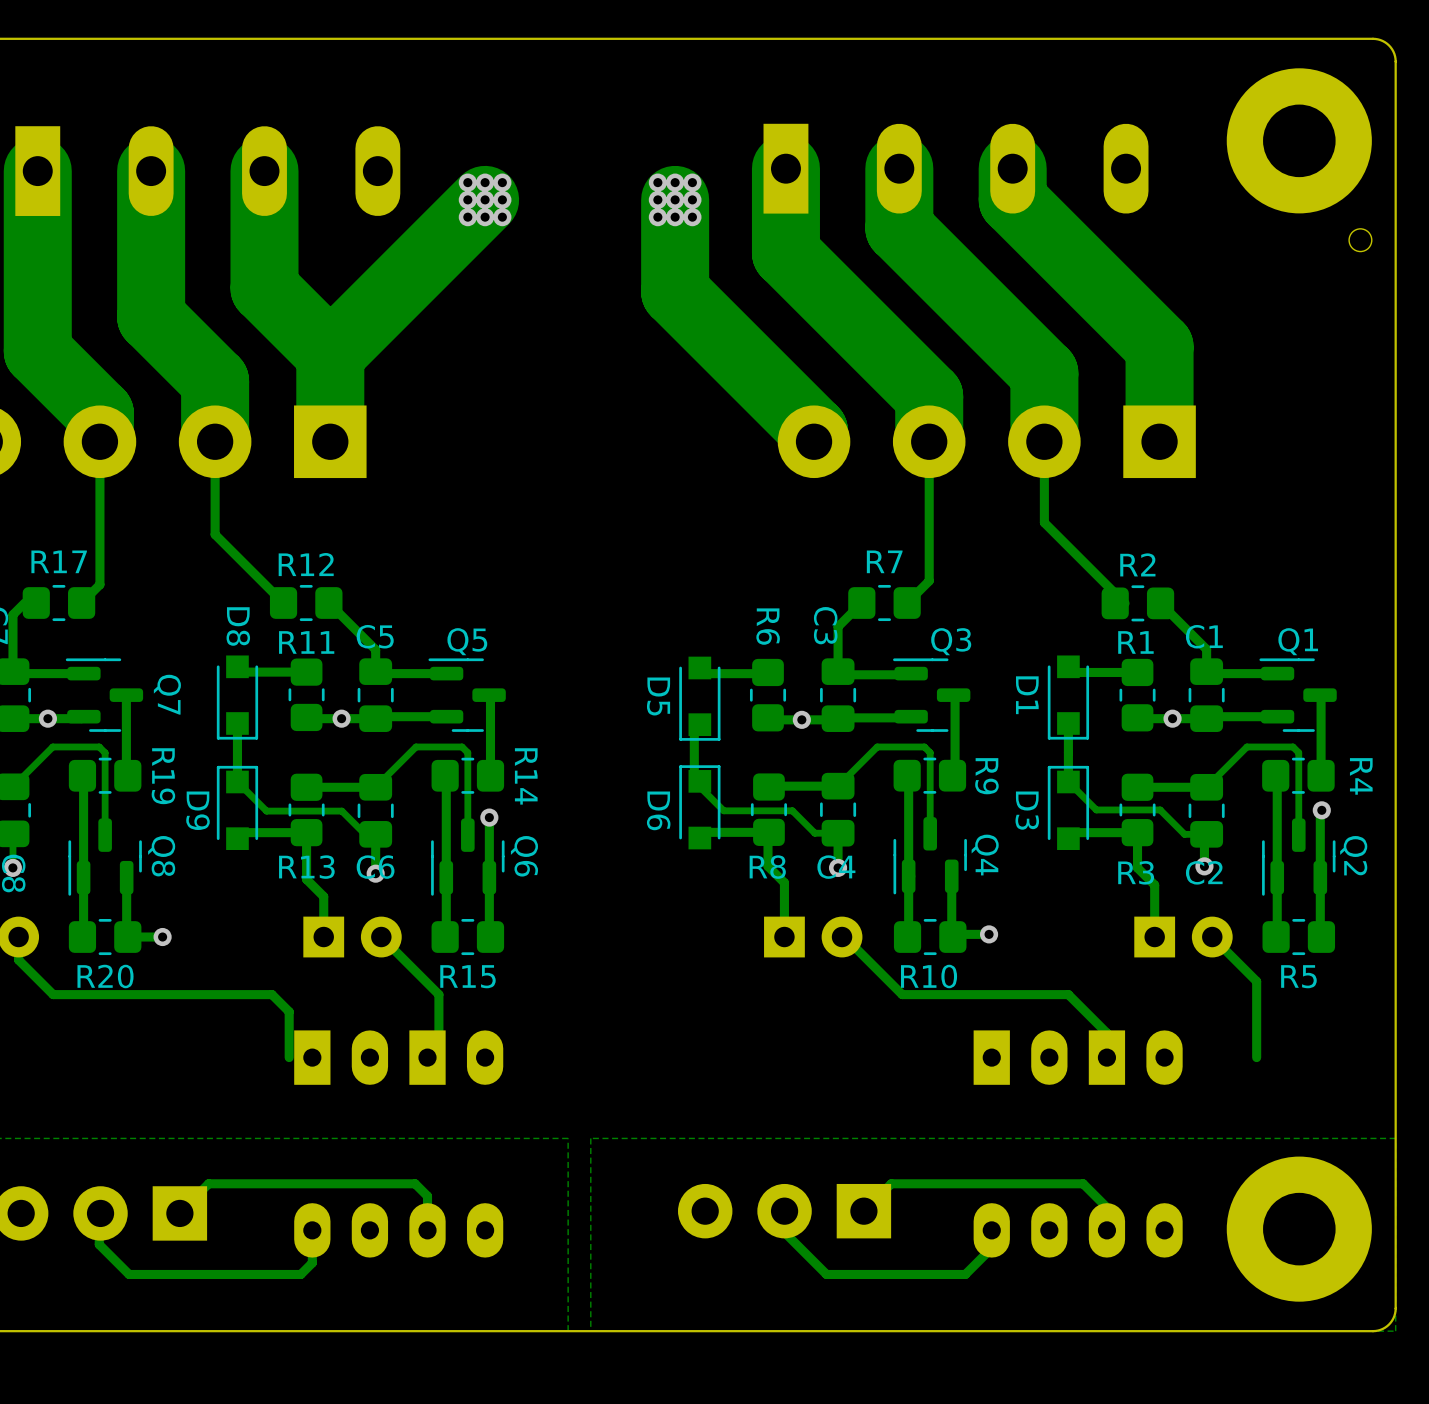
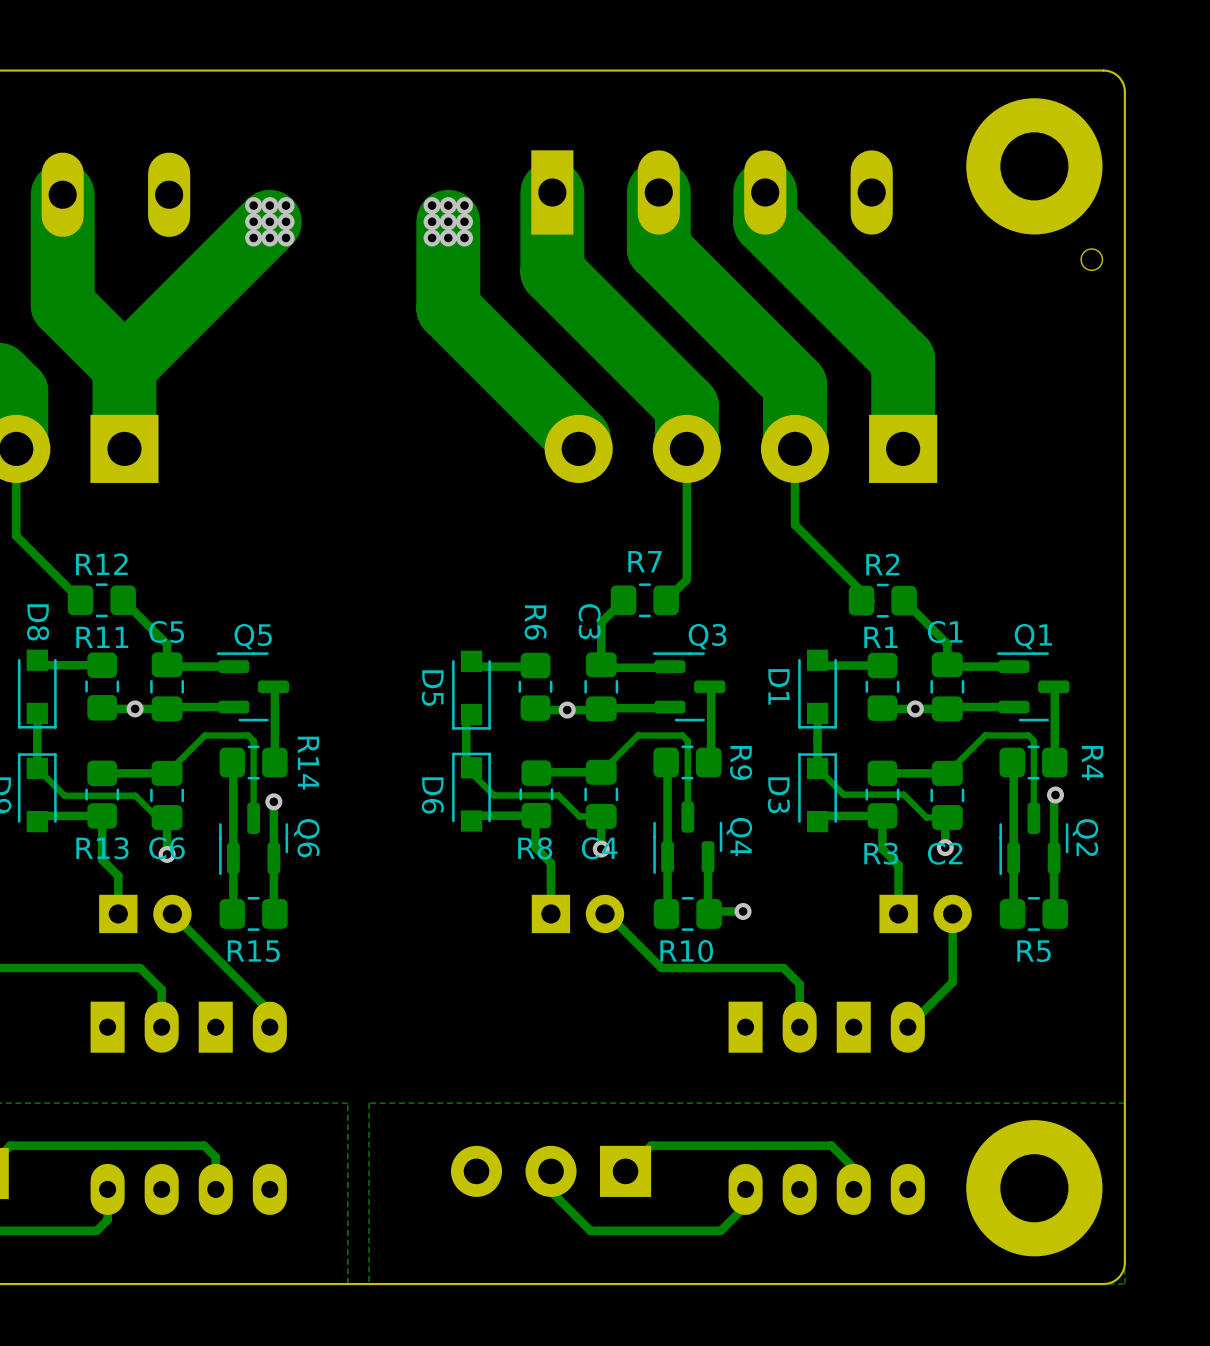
track: (1212, 937) (1256, 981) (1256, 1057) -> (952, 913) (952, 982) (907, 1027)
track: (272, 994) (289, 1011) (289, 1057) -> (69, 968) (140, 968) (161, 989) (161, 1027)
track: (438, 994) (438, 1057) -> (226, 968) (269, 1011) (269, 1027)
track: (1032, 994) (1068, 994) (1106, 1033) (1106, 1057) -> (783, 968) (799, 984) (799, 1027)

